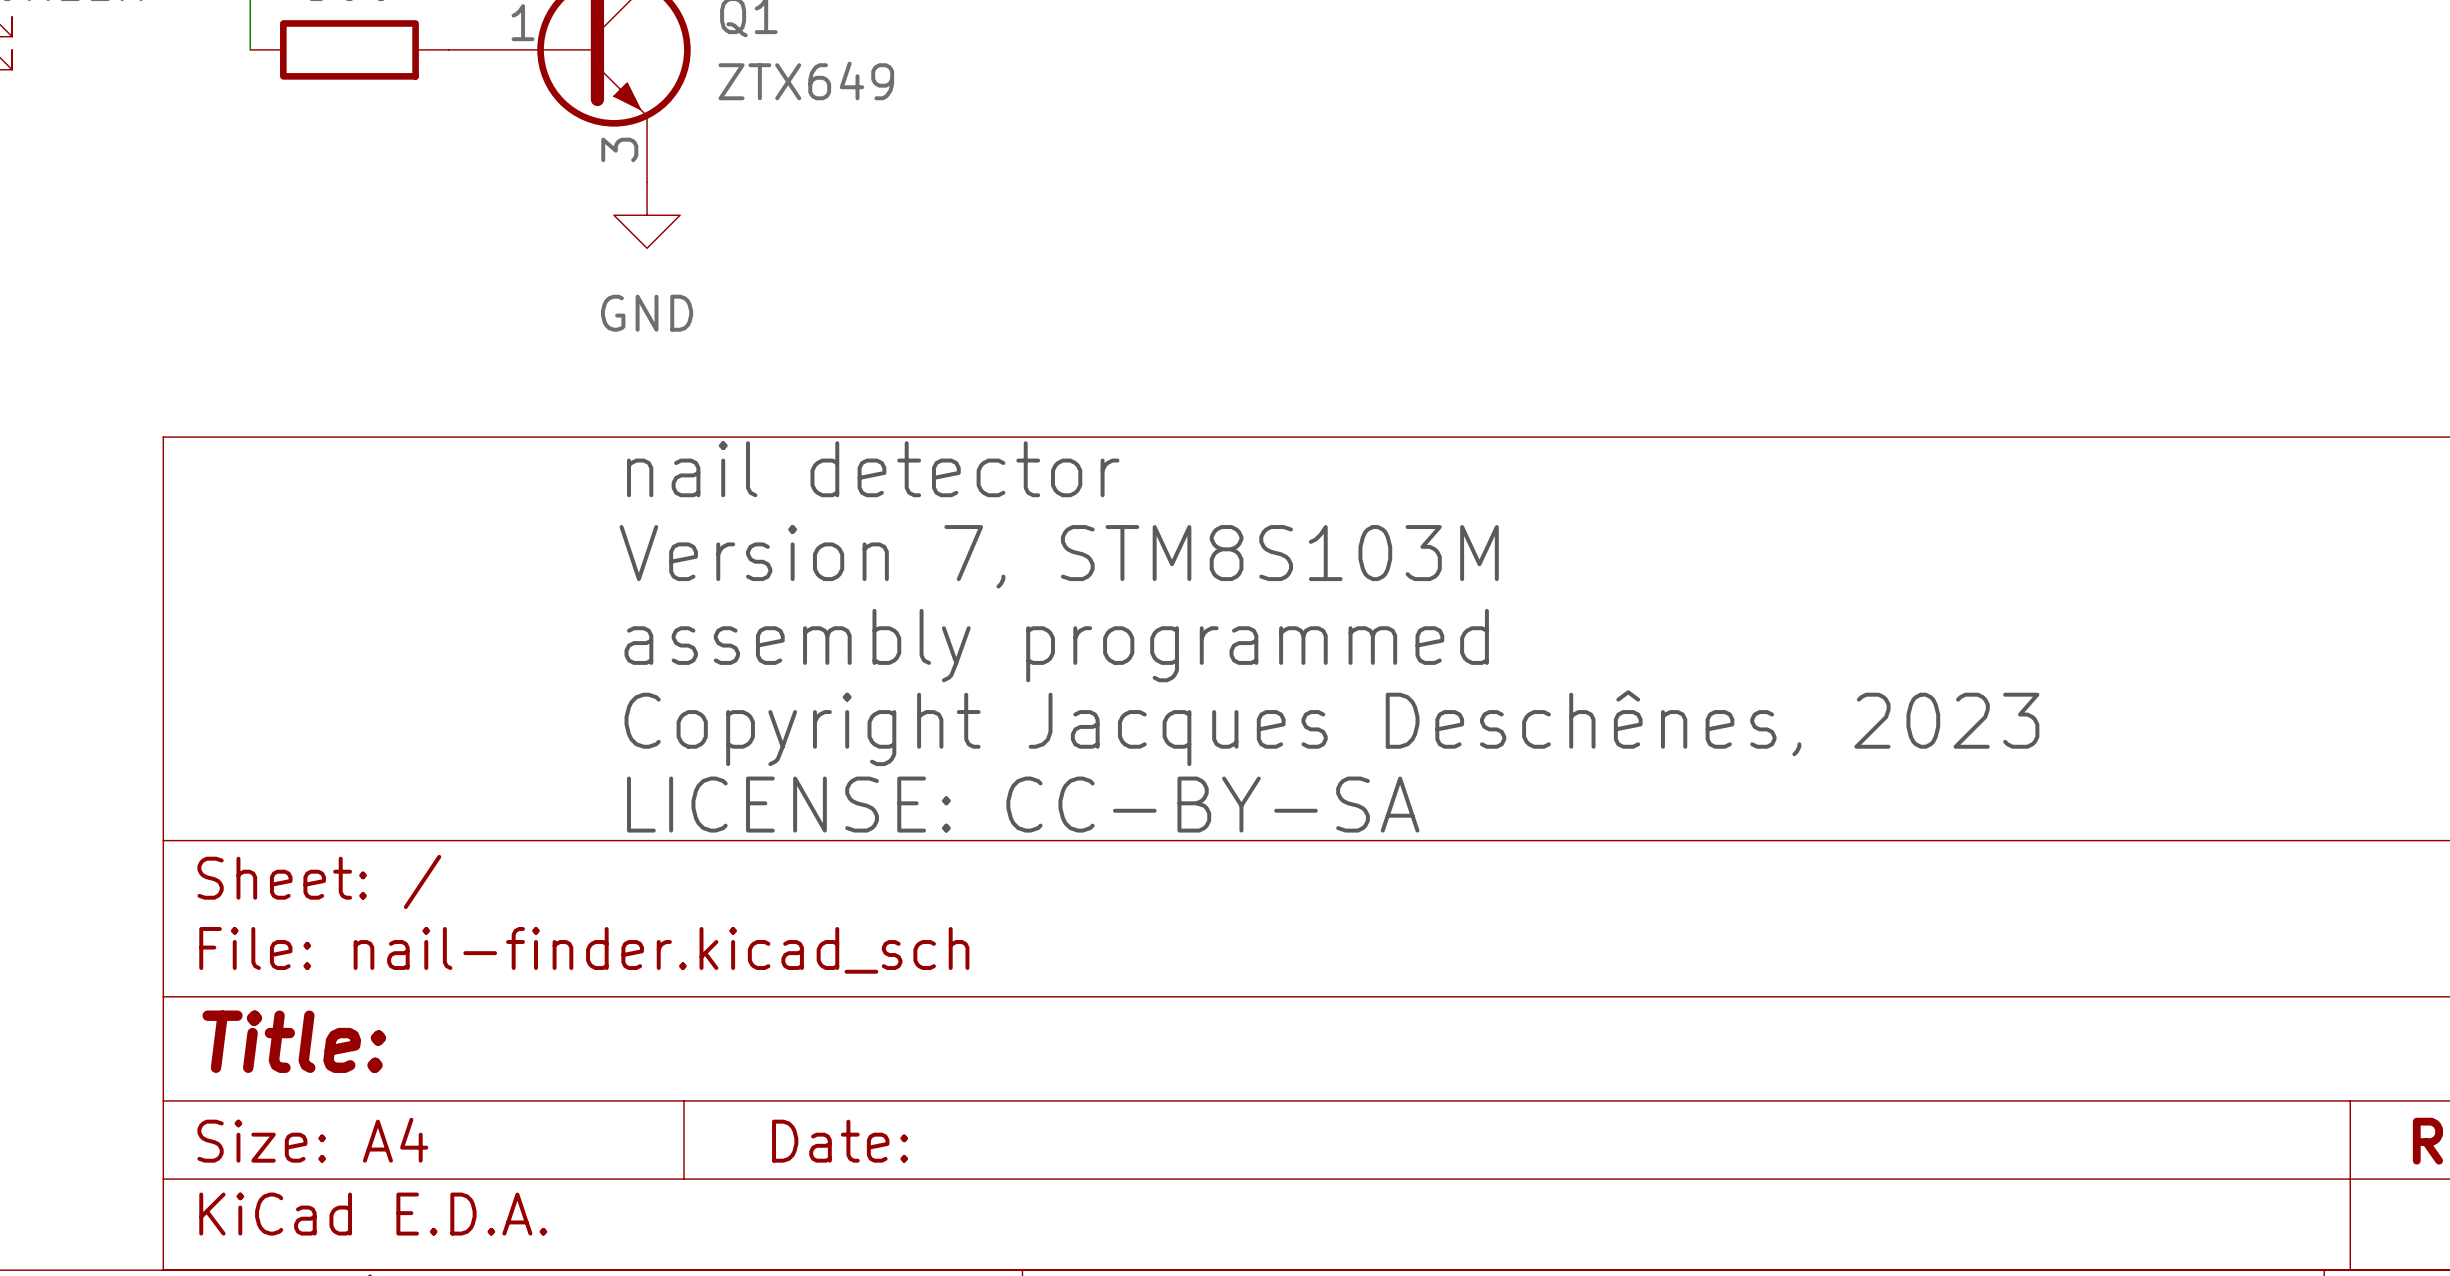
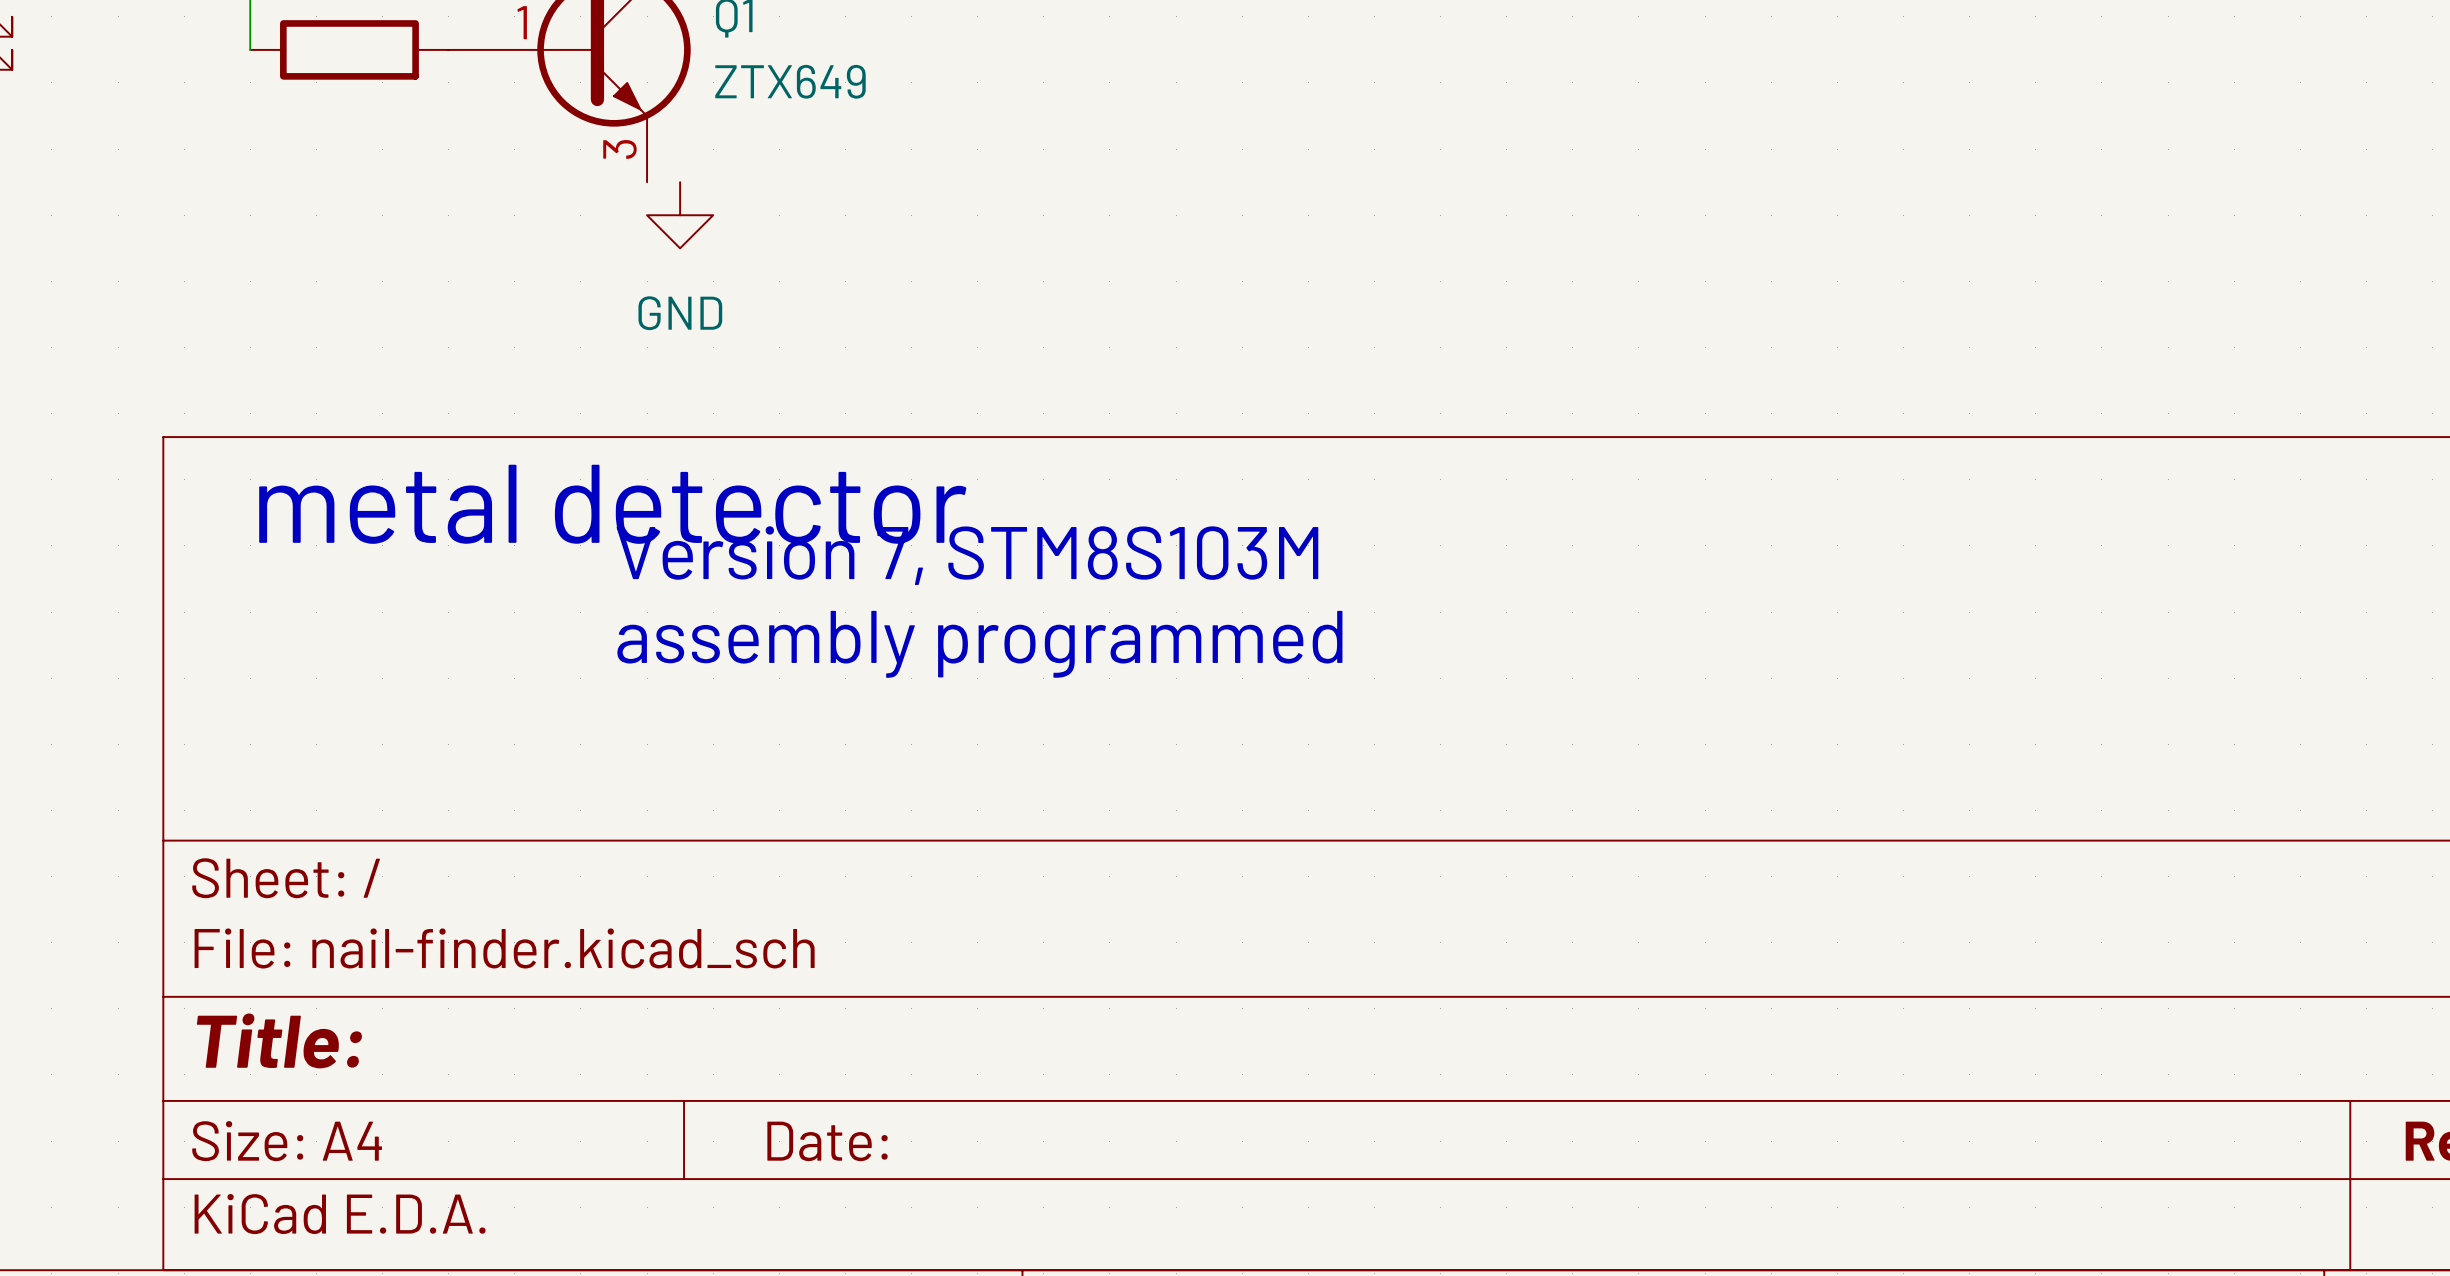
power symbol position: GND (647, 215) -> GND (680, 215)
text: nail detector (873, 469) -> metal detector (612, 504)
text: Copyright Jacques Deschênes, 2023 (1331, 728) -> none
text: LICENSE: CC-BY-SA (1023, 804) -> none

